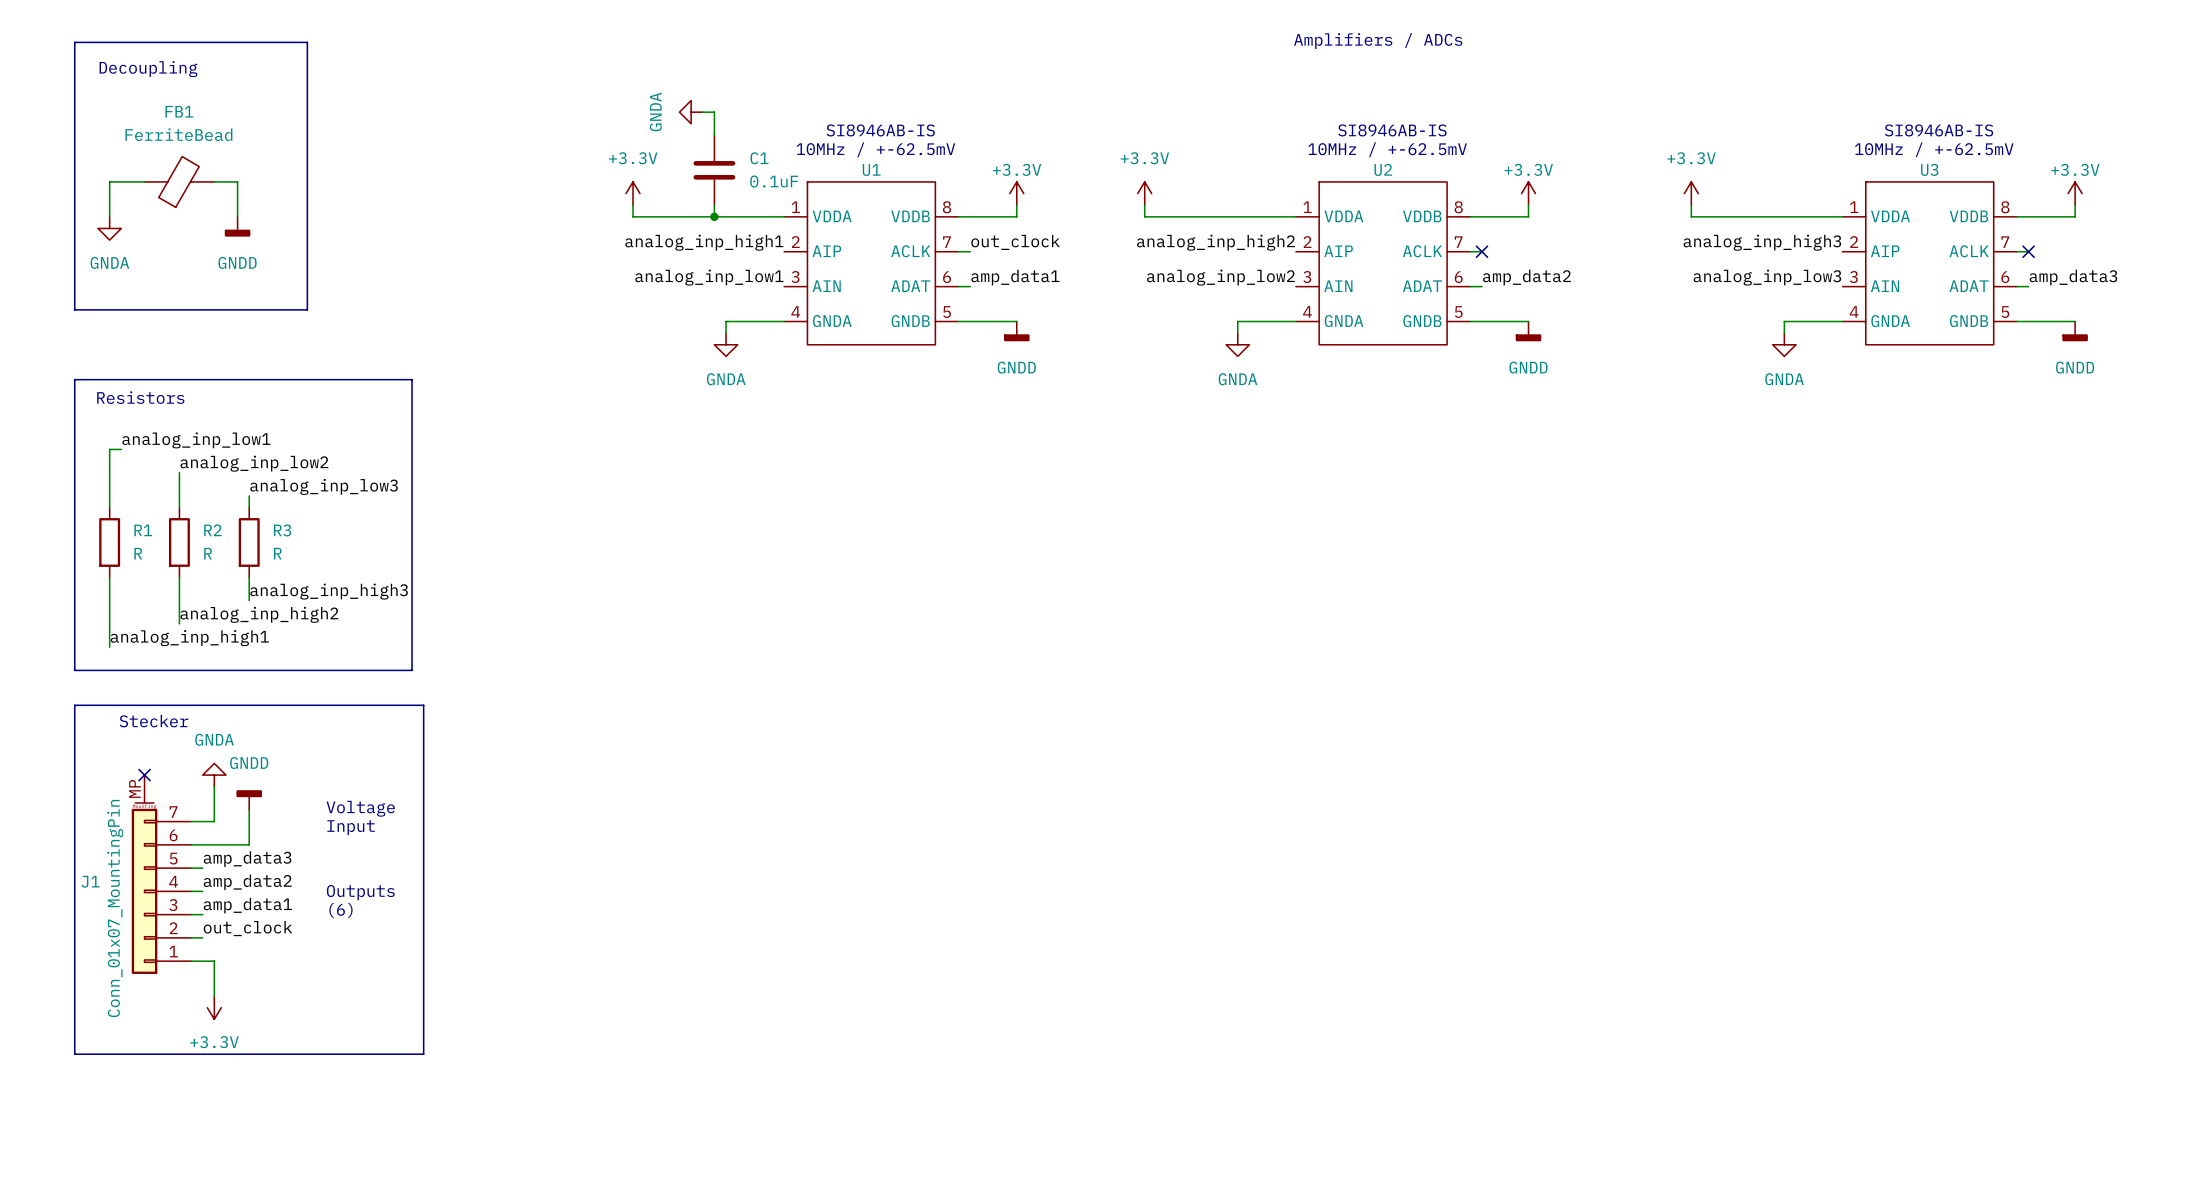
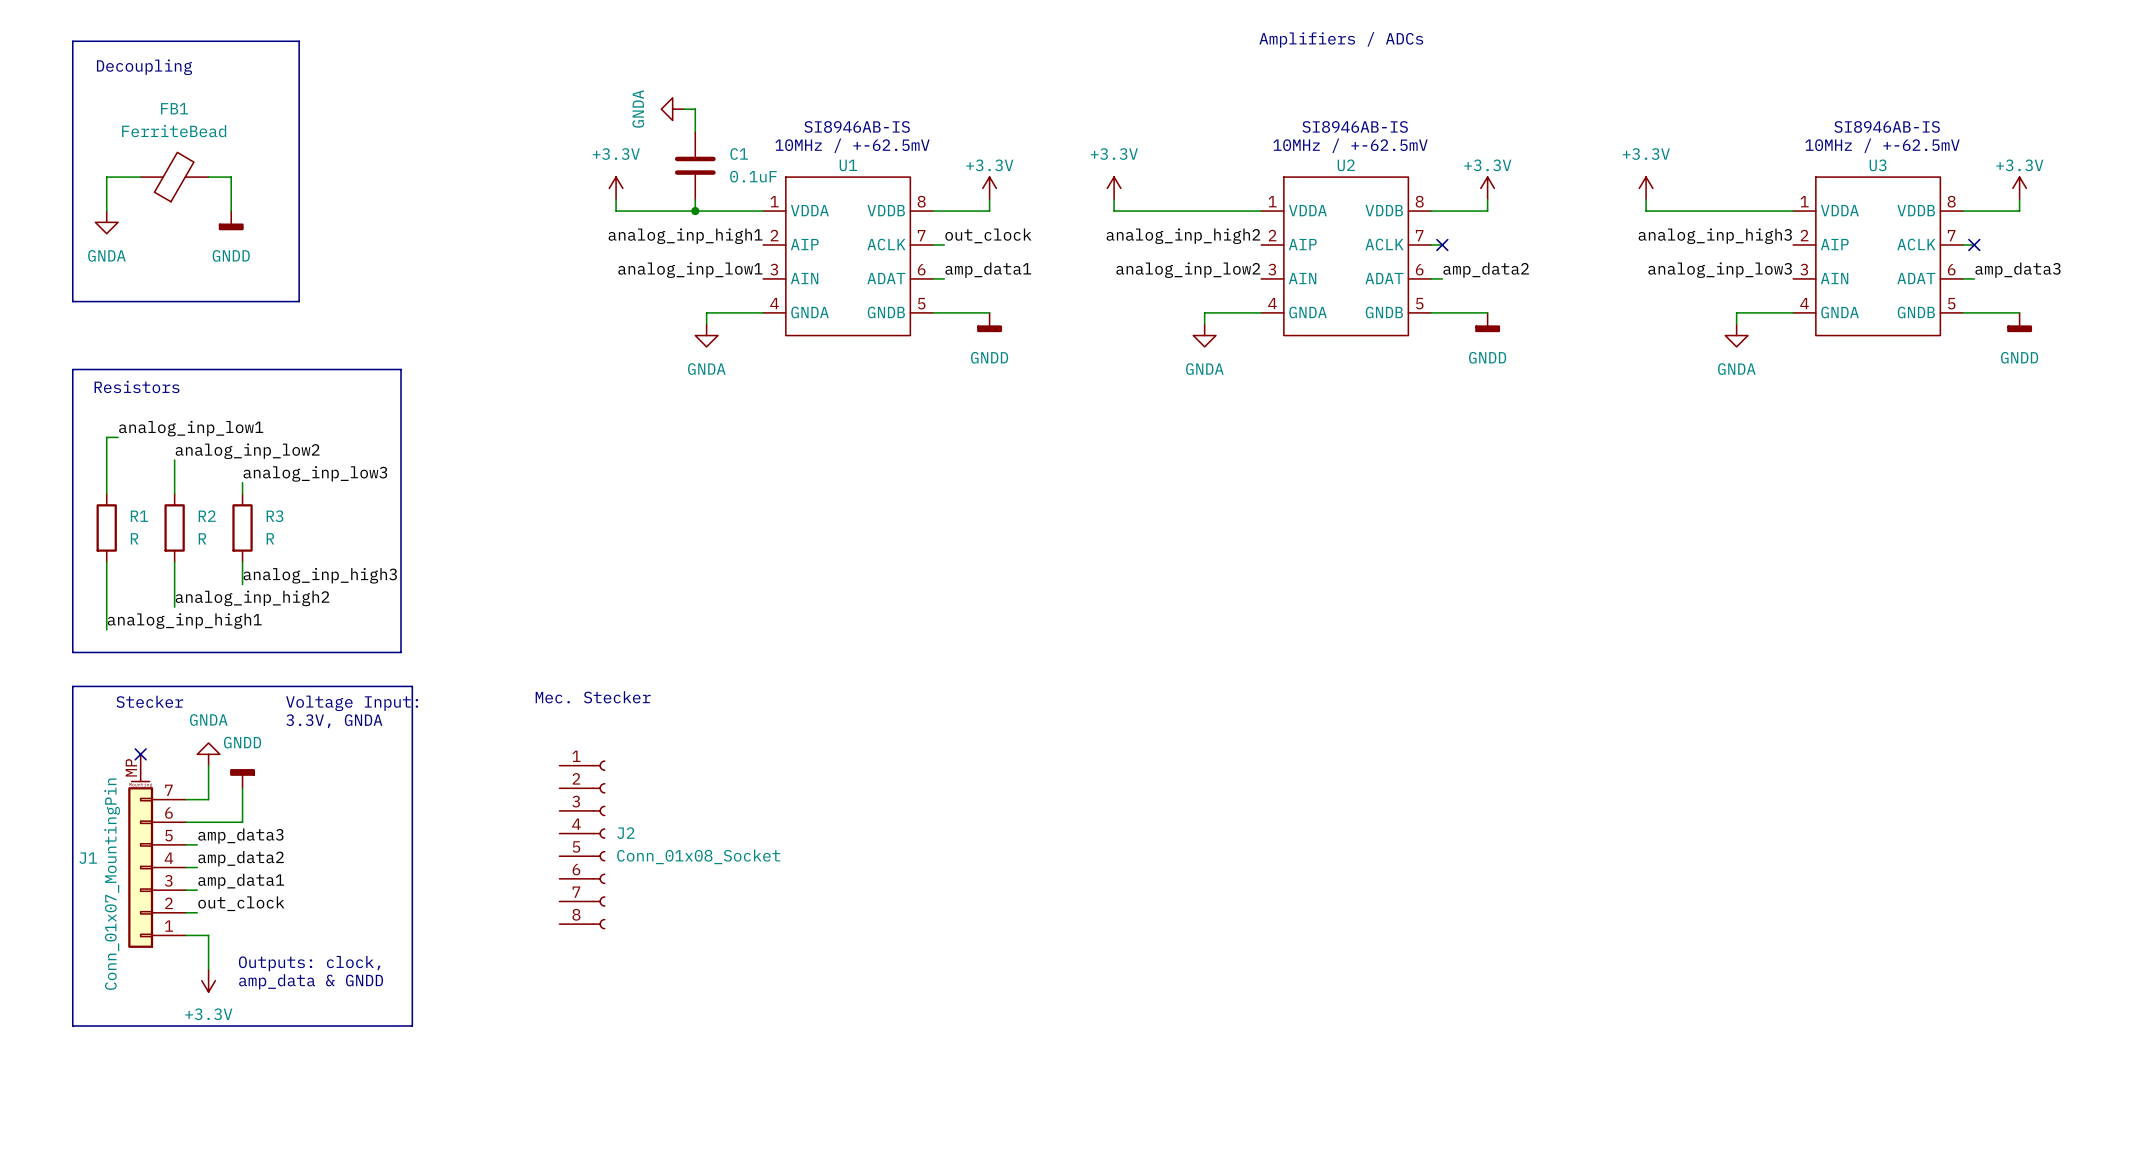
text: none -> Mec. Stecker (593, 697)
text: none -> Voltage Input: (352, 703)
text: none -> 3.3V, GNDA (334, 721)
text: Voltage (360, 808) -> none
text: Input (351, 827) -> none
J2: none -> Conn_01x08_Socket (582, 844)
text: Outputs (360, 892) -> none
text: (6) (340, 910) -> none
text: none -> Outputs: clock, (309, 963)
text: none -> amp_data & GNDD (311, 981)

